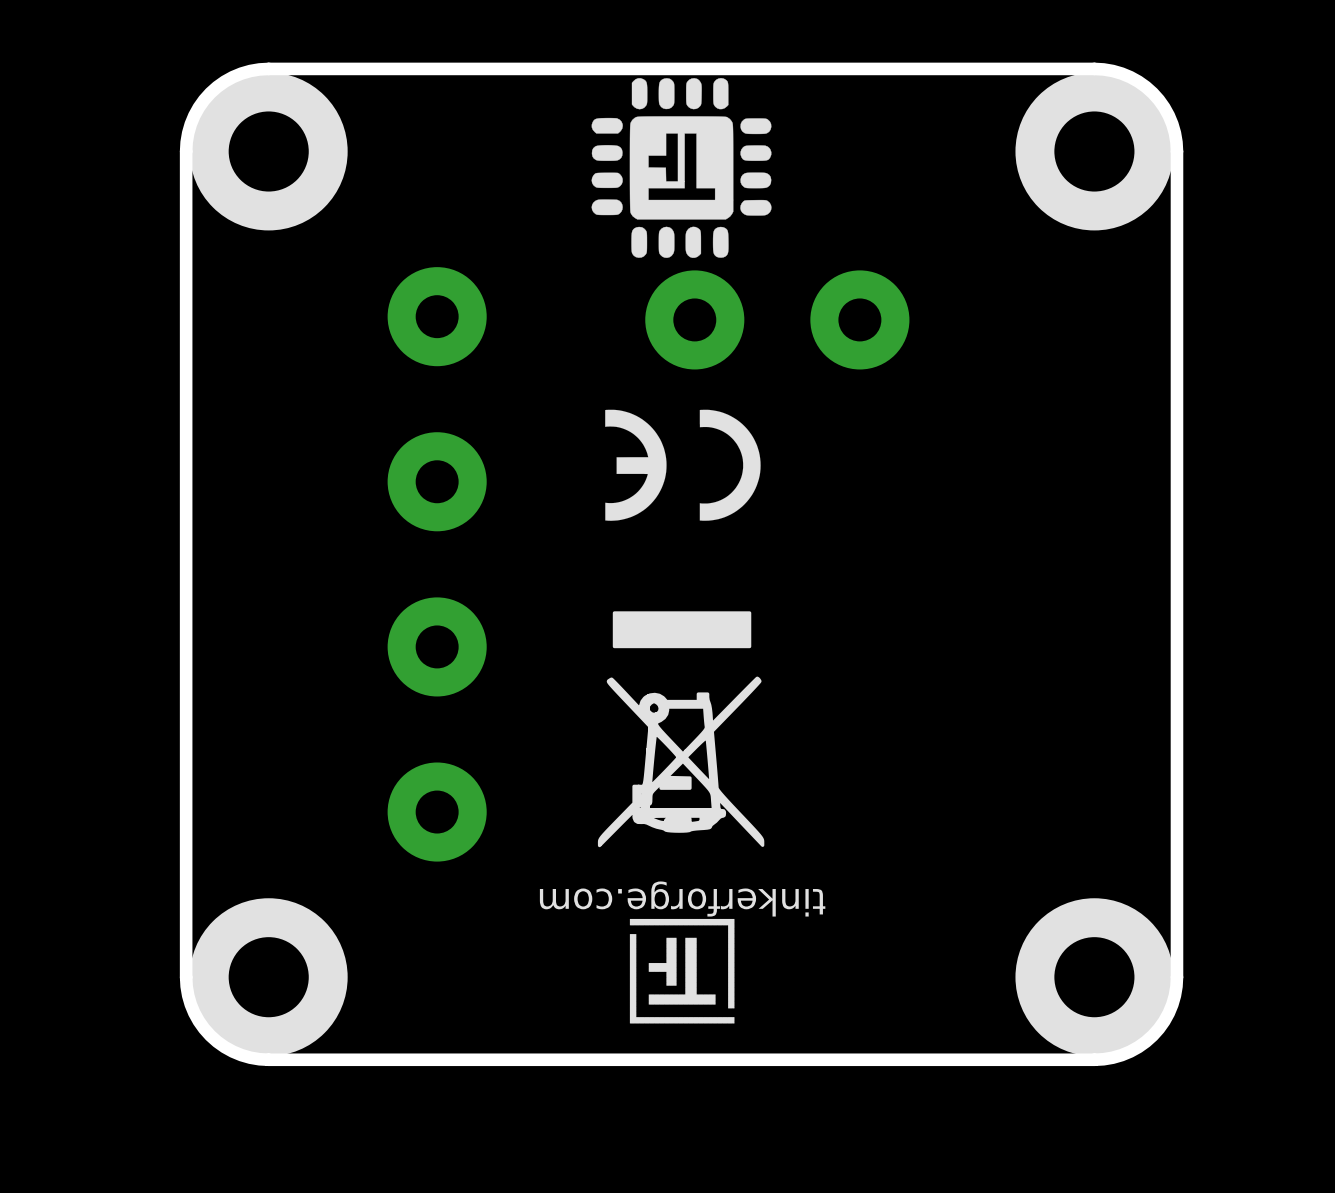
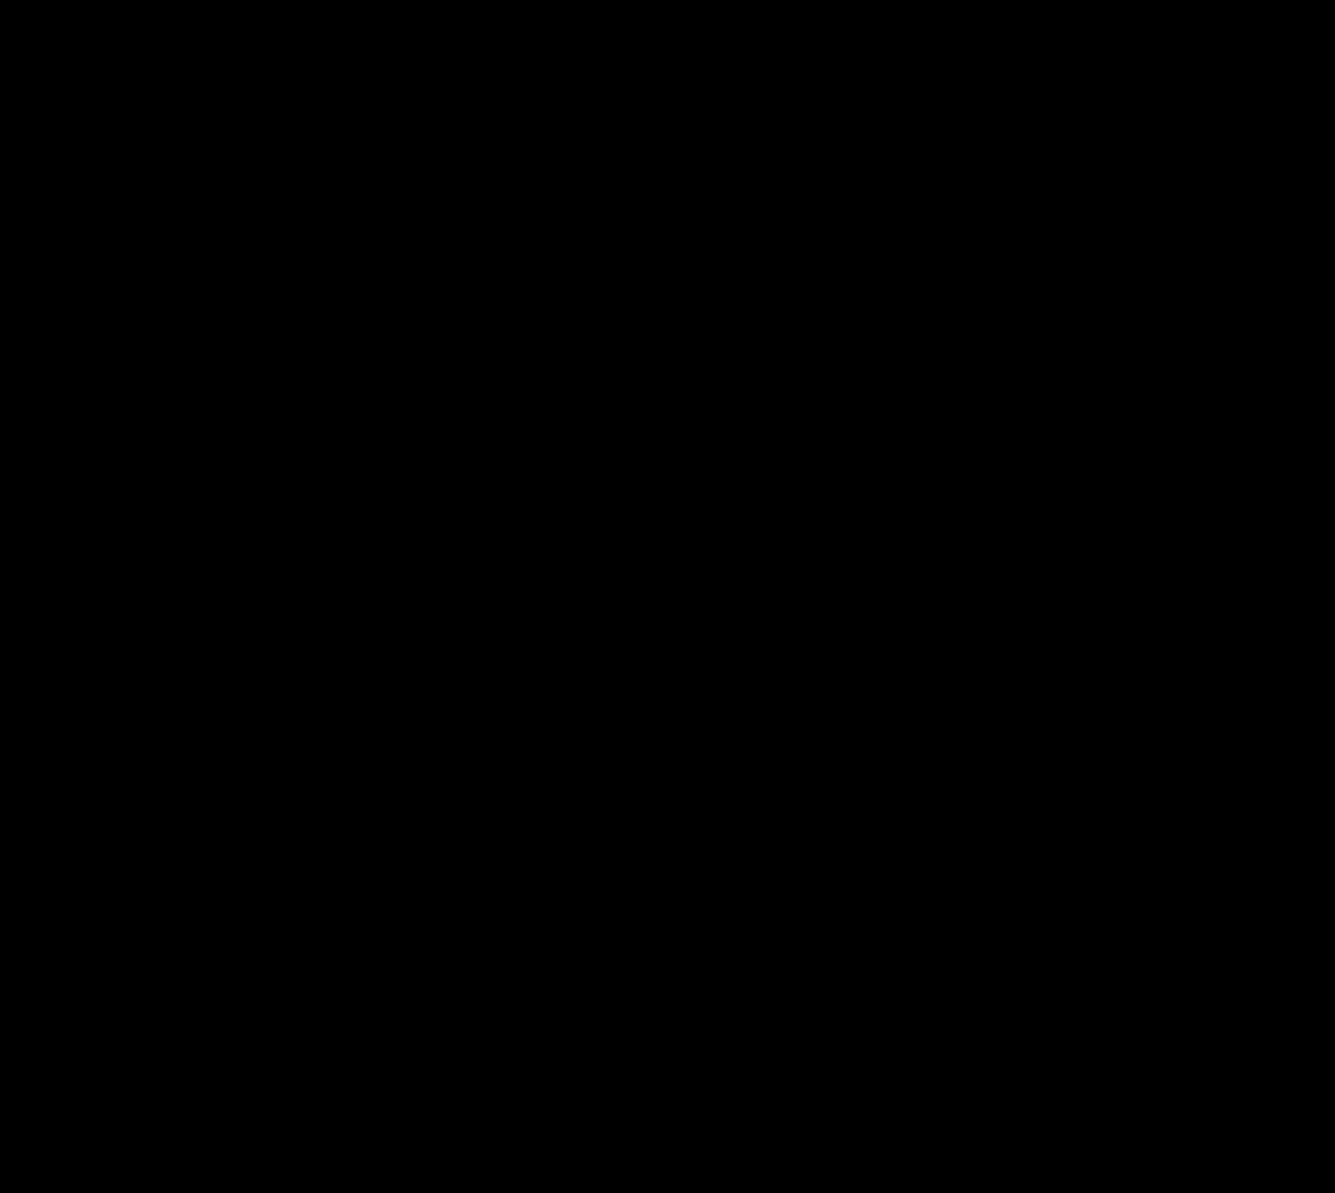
board edge: (1094, 68) (268, 68) (241, 73) (224, 81) (210, 93) (194, 115) (188, 133) (186, 151) (186, 977) (188, 995) (194, 1013) (210, 1035) (232, 1051) (250, 1057) (268, 1059) (1094, 1059) (1121, 1055) (1138, 1047) (1152, 1035) (1164, 1021) (1172, 1004) (1176, 977) (1176, 142) (1168, 115) (1152, 93) (1130, 77) (1112, 71) (1094, 68) -> none
drawing: [591, 78, 772, 258] -> none
part: (268, 151) -> none
part: (1094, 151) -> none
part: (777, 319) -> none
part: (437, 399) -> none
drawing: [605, 409, 761, 521] -> none
drawing: [597, 611, 765, 848] -> none
part: (437, 729) -> none
text: tinkerforge.com (682, 899) -> none
drawing: [629, 918, 735, 1024] -> none
part: (268, 977) -> none
part: (1094, 977) -> none

